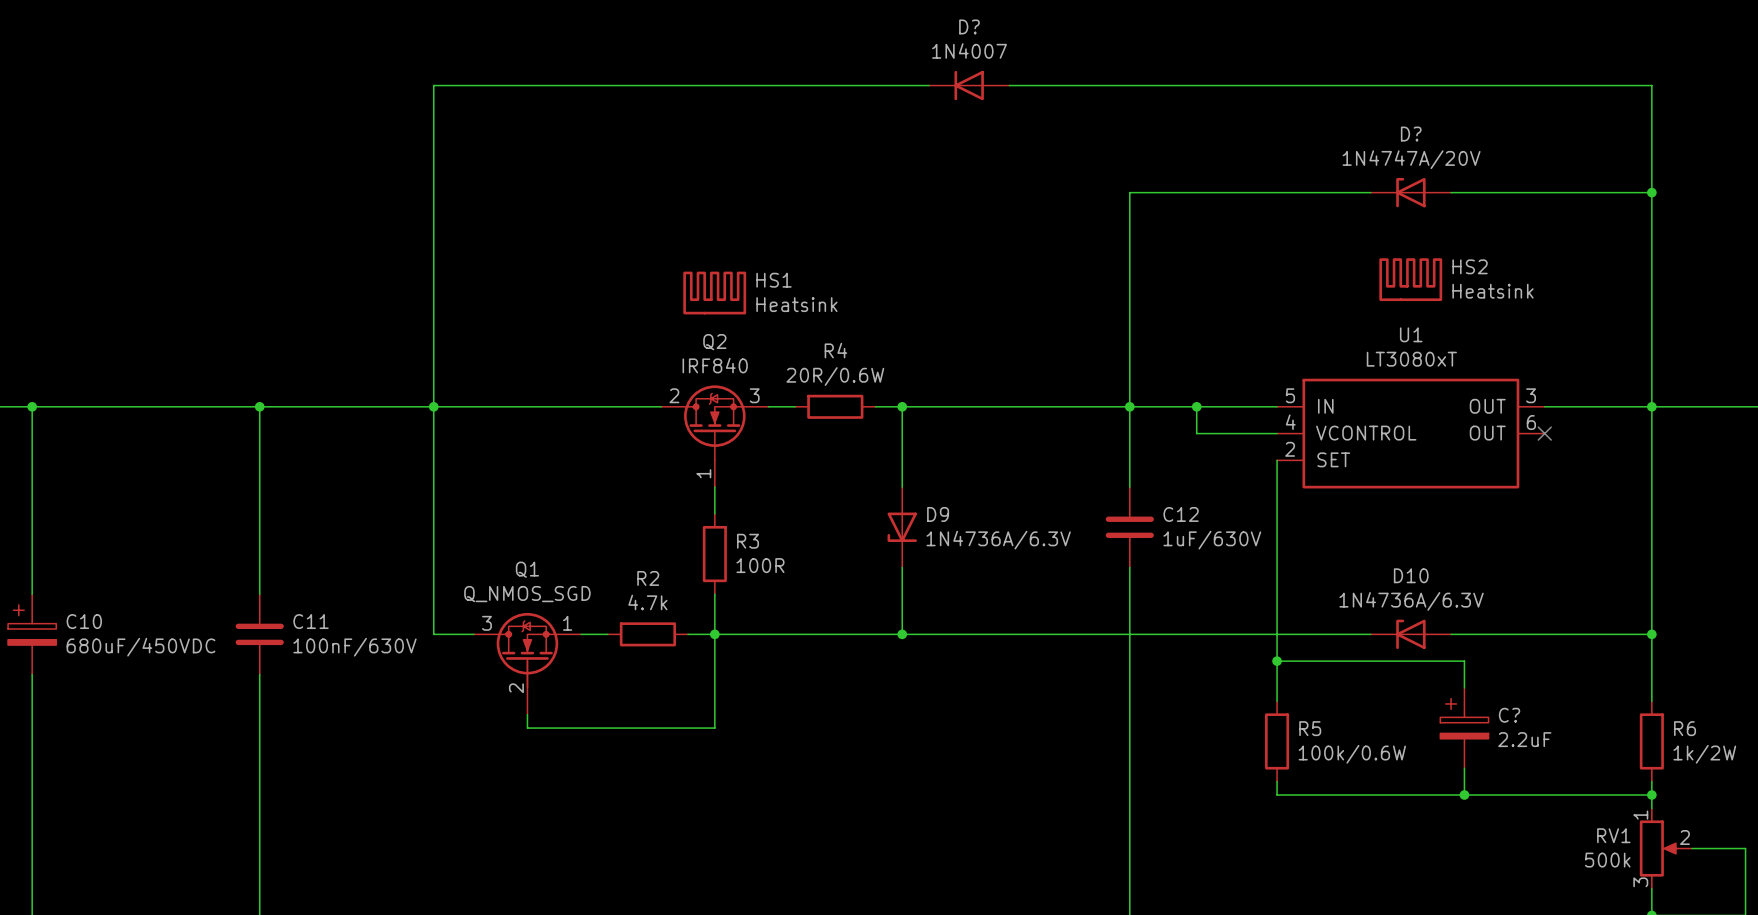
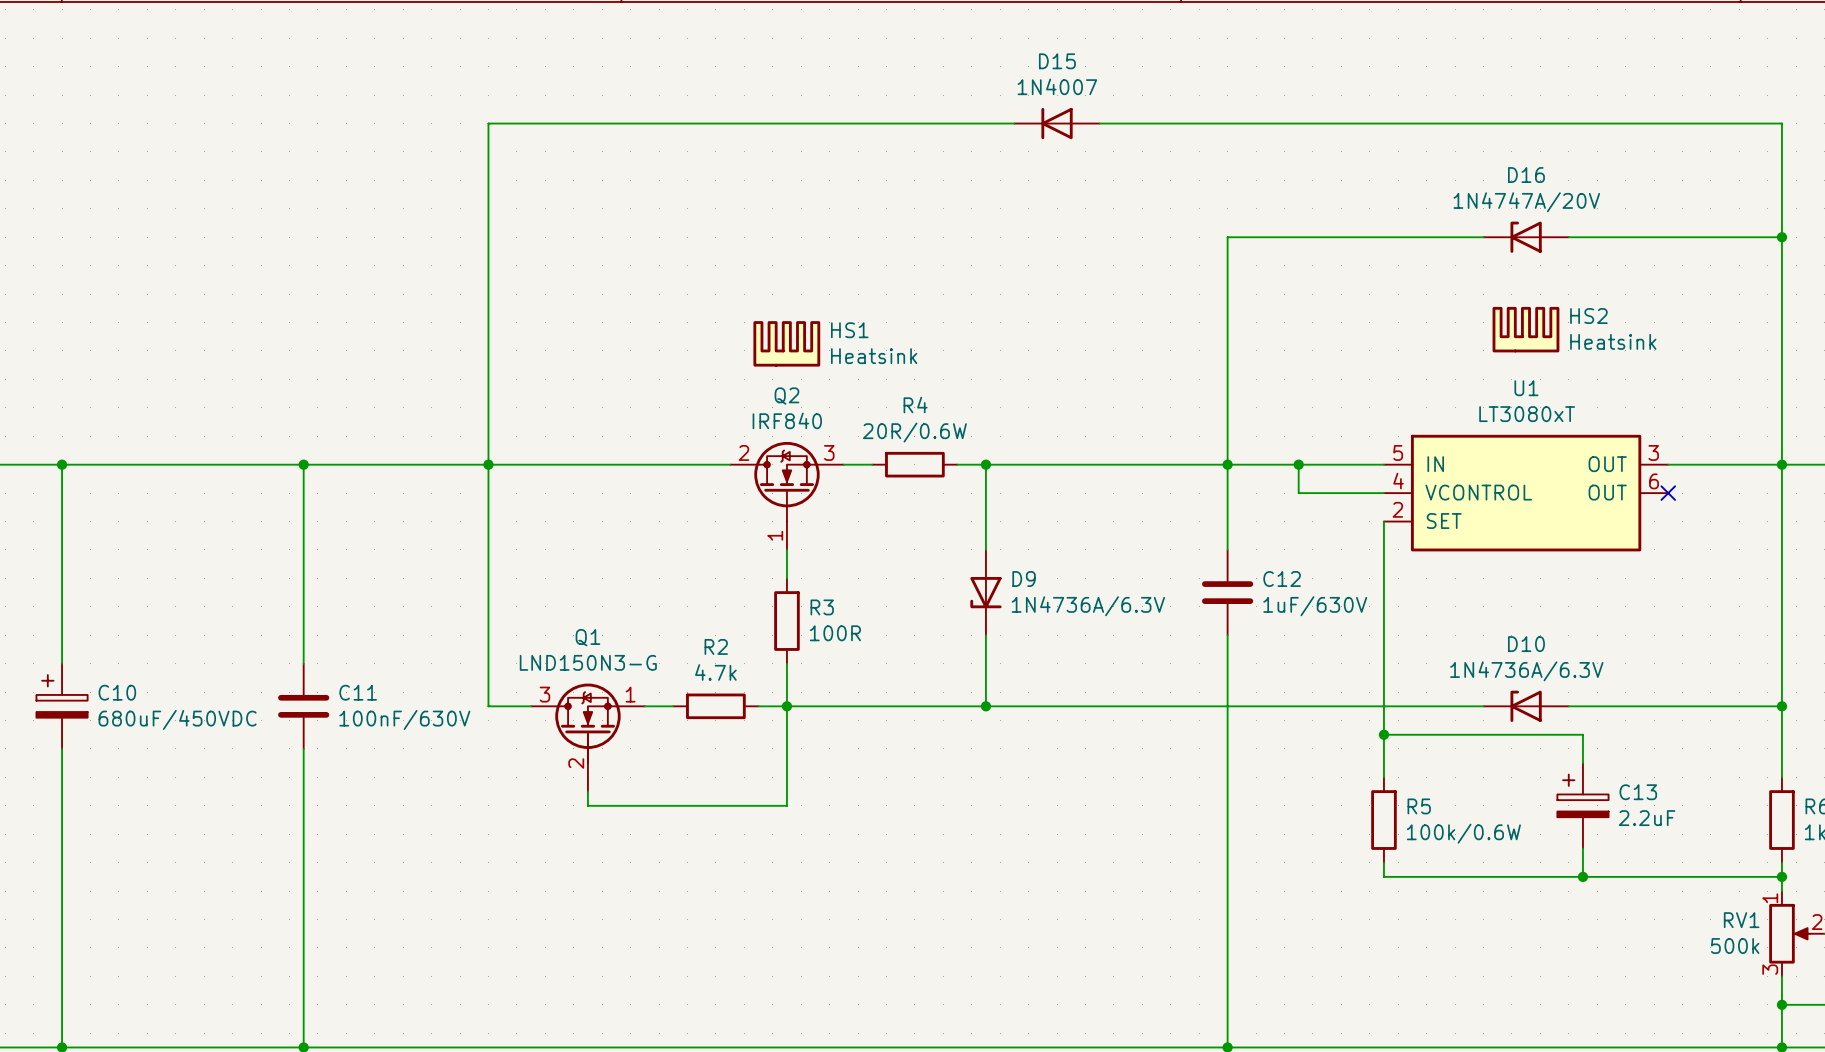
D? name: D? (969, 26) -> D15 (1057, 61)
D? name: D? (1411, 134) -> D16 (1526, 175)
Q1 value: Q_NMOS_SGD (527, 594) -> LND150N3-G (588, 662)
C? name: C? (1509, 715) -> C13 (1638, 792)

